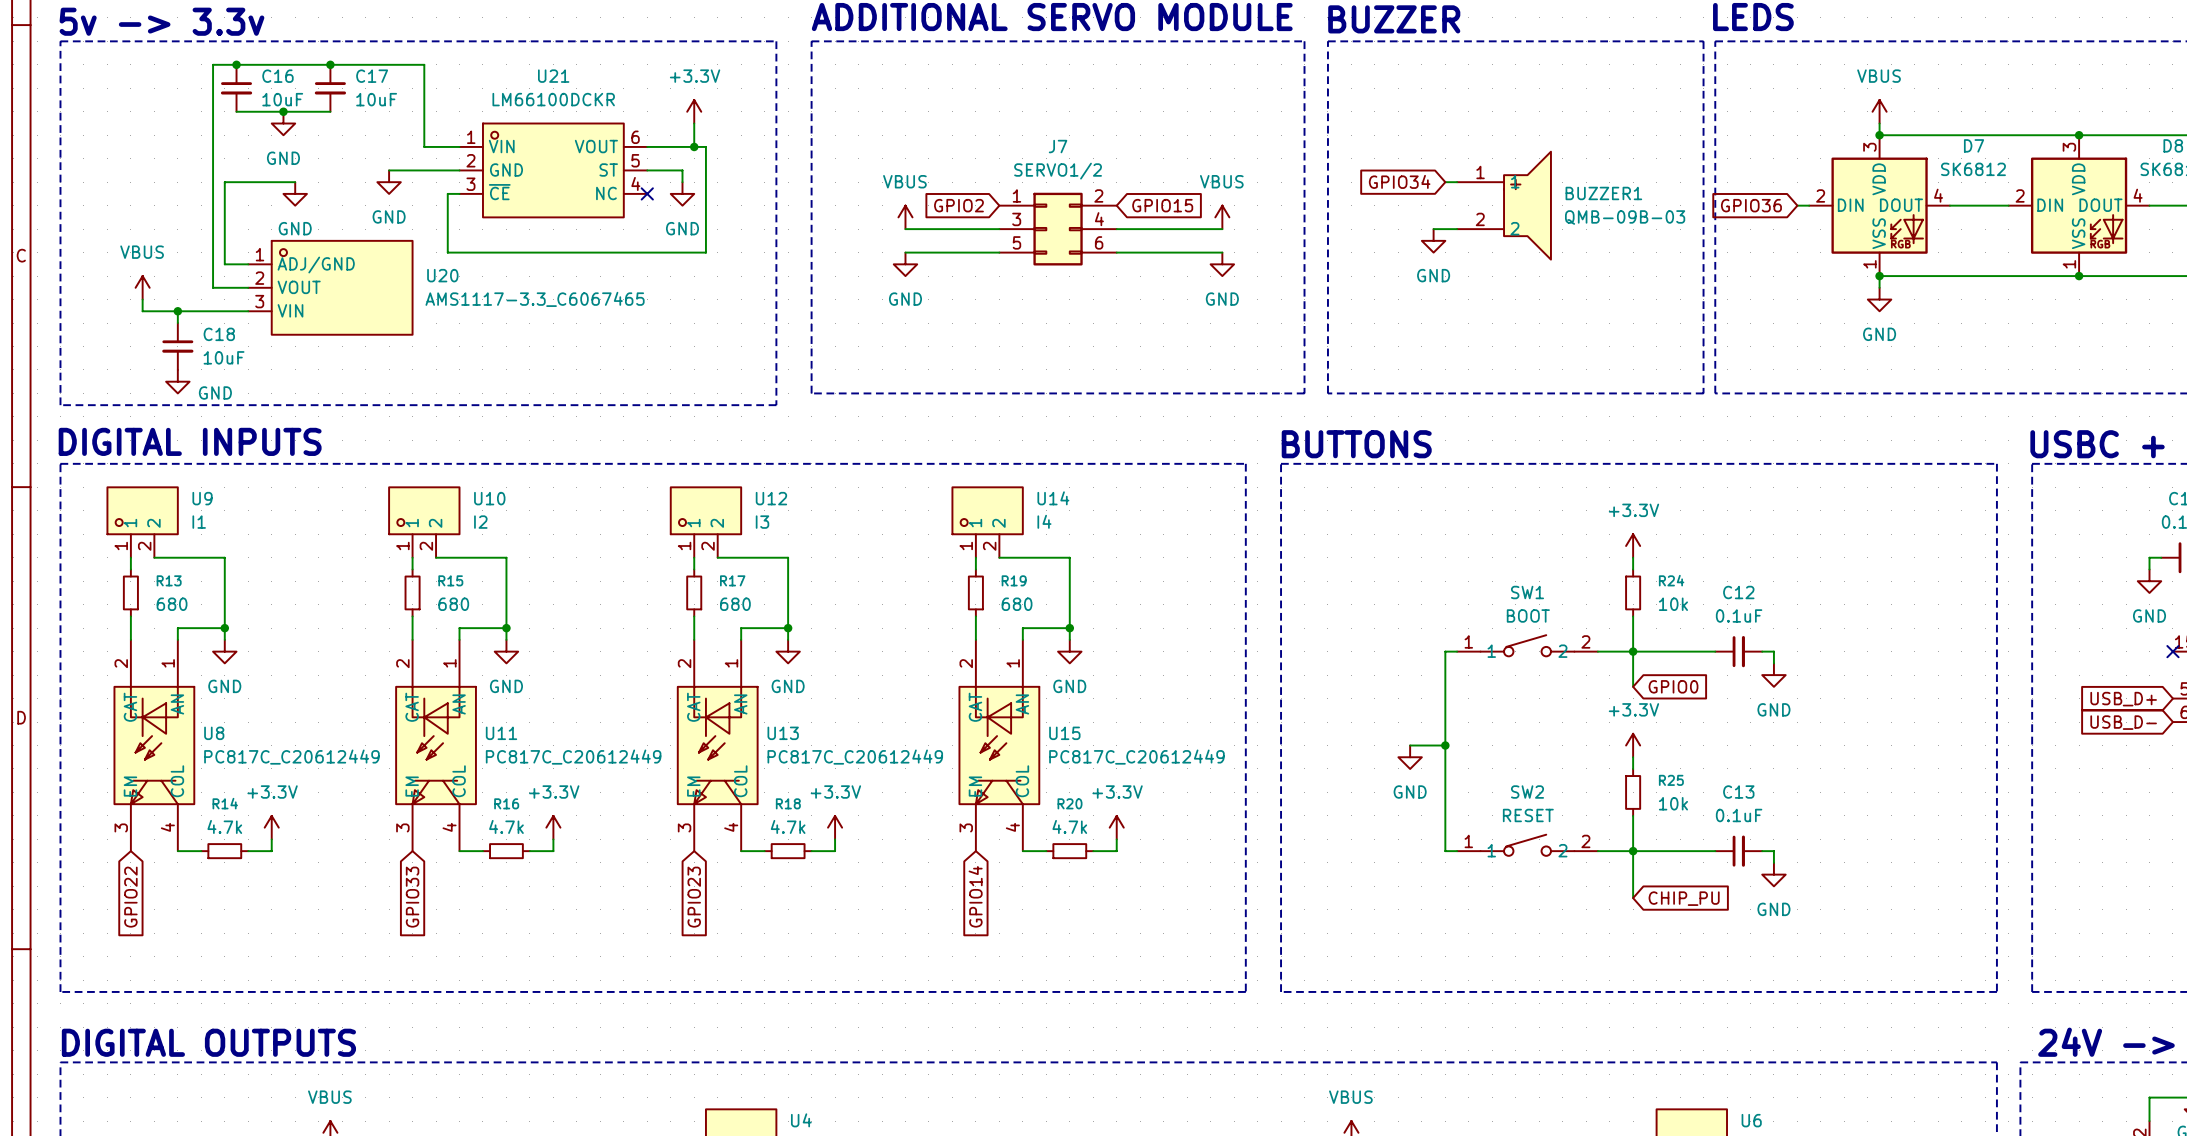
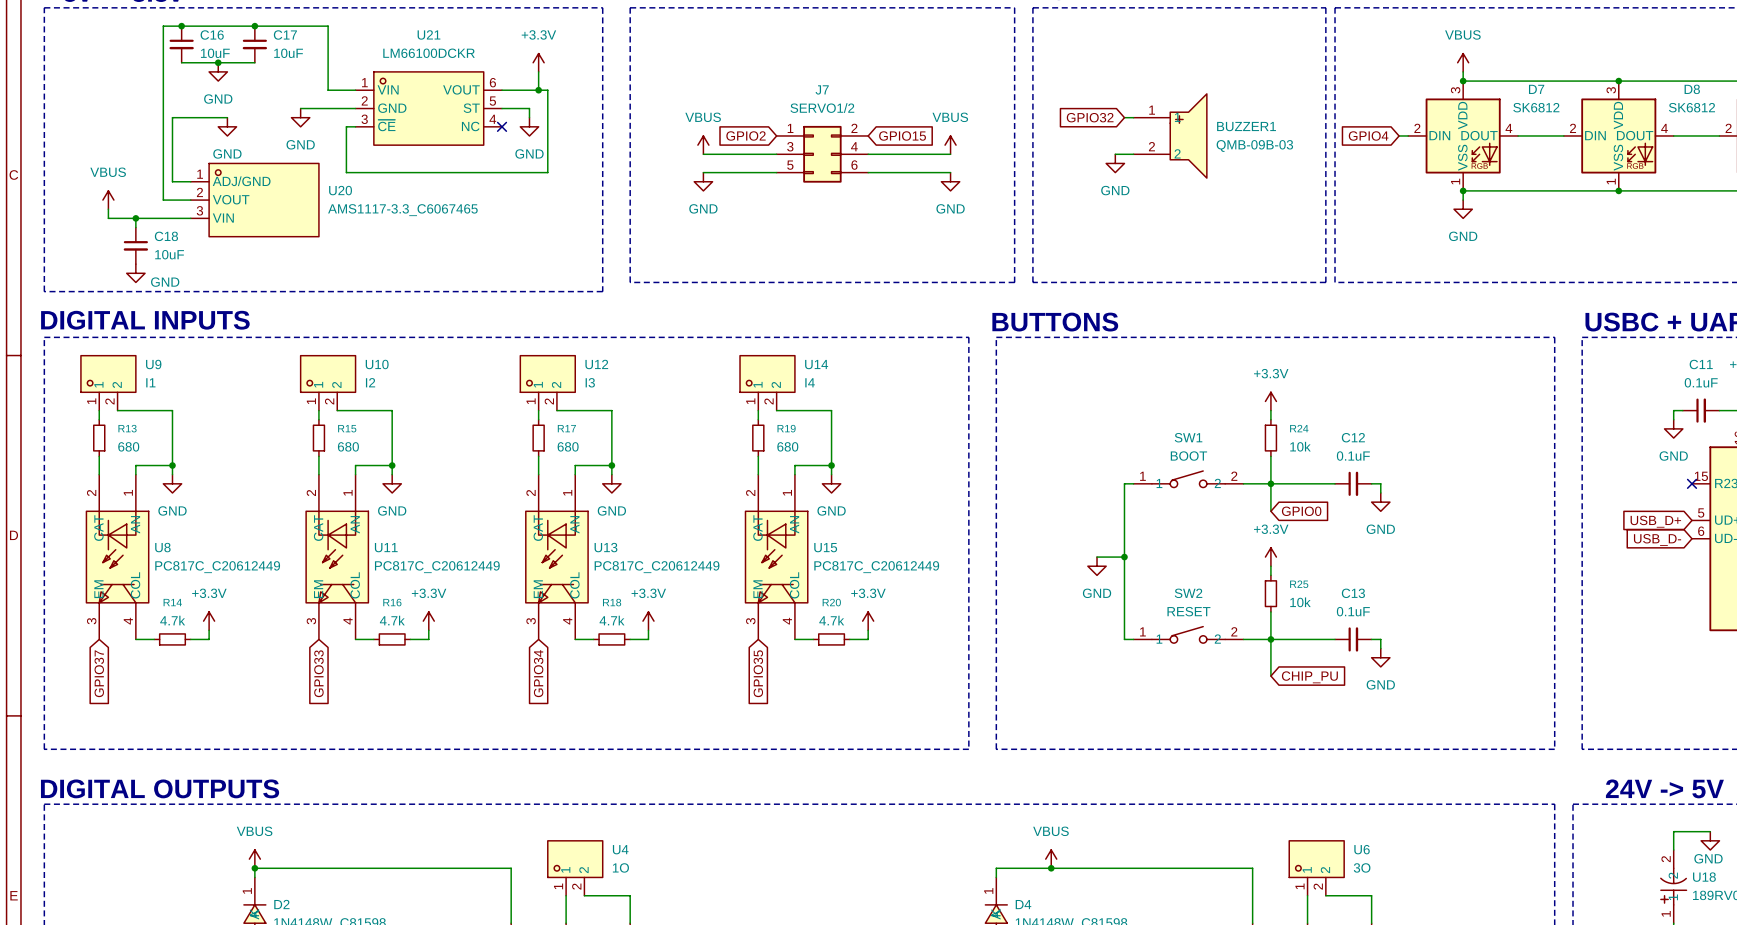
global label: GPIO34 (1399, 181) -> GPIO32 (1090, 117)
global label: GPIO36 (1751, 205) -> GPIO4 (1368, 135)
global label: GPIO14 (975, 896) -> GPIO35 (758, 673)
global label: GPIO22 (130, 897) -> GPIO37 (99, 673)
global label: GPIO23 (694, 897) -> GPIO34 (538, 673)

